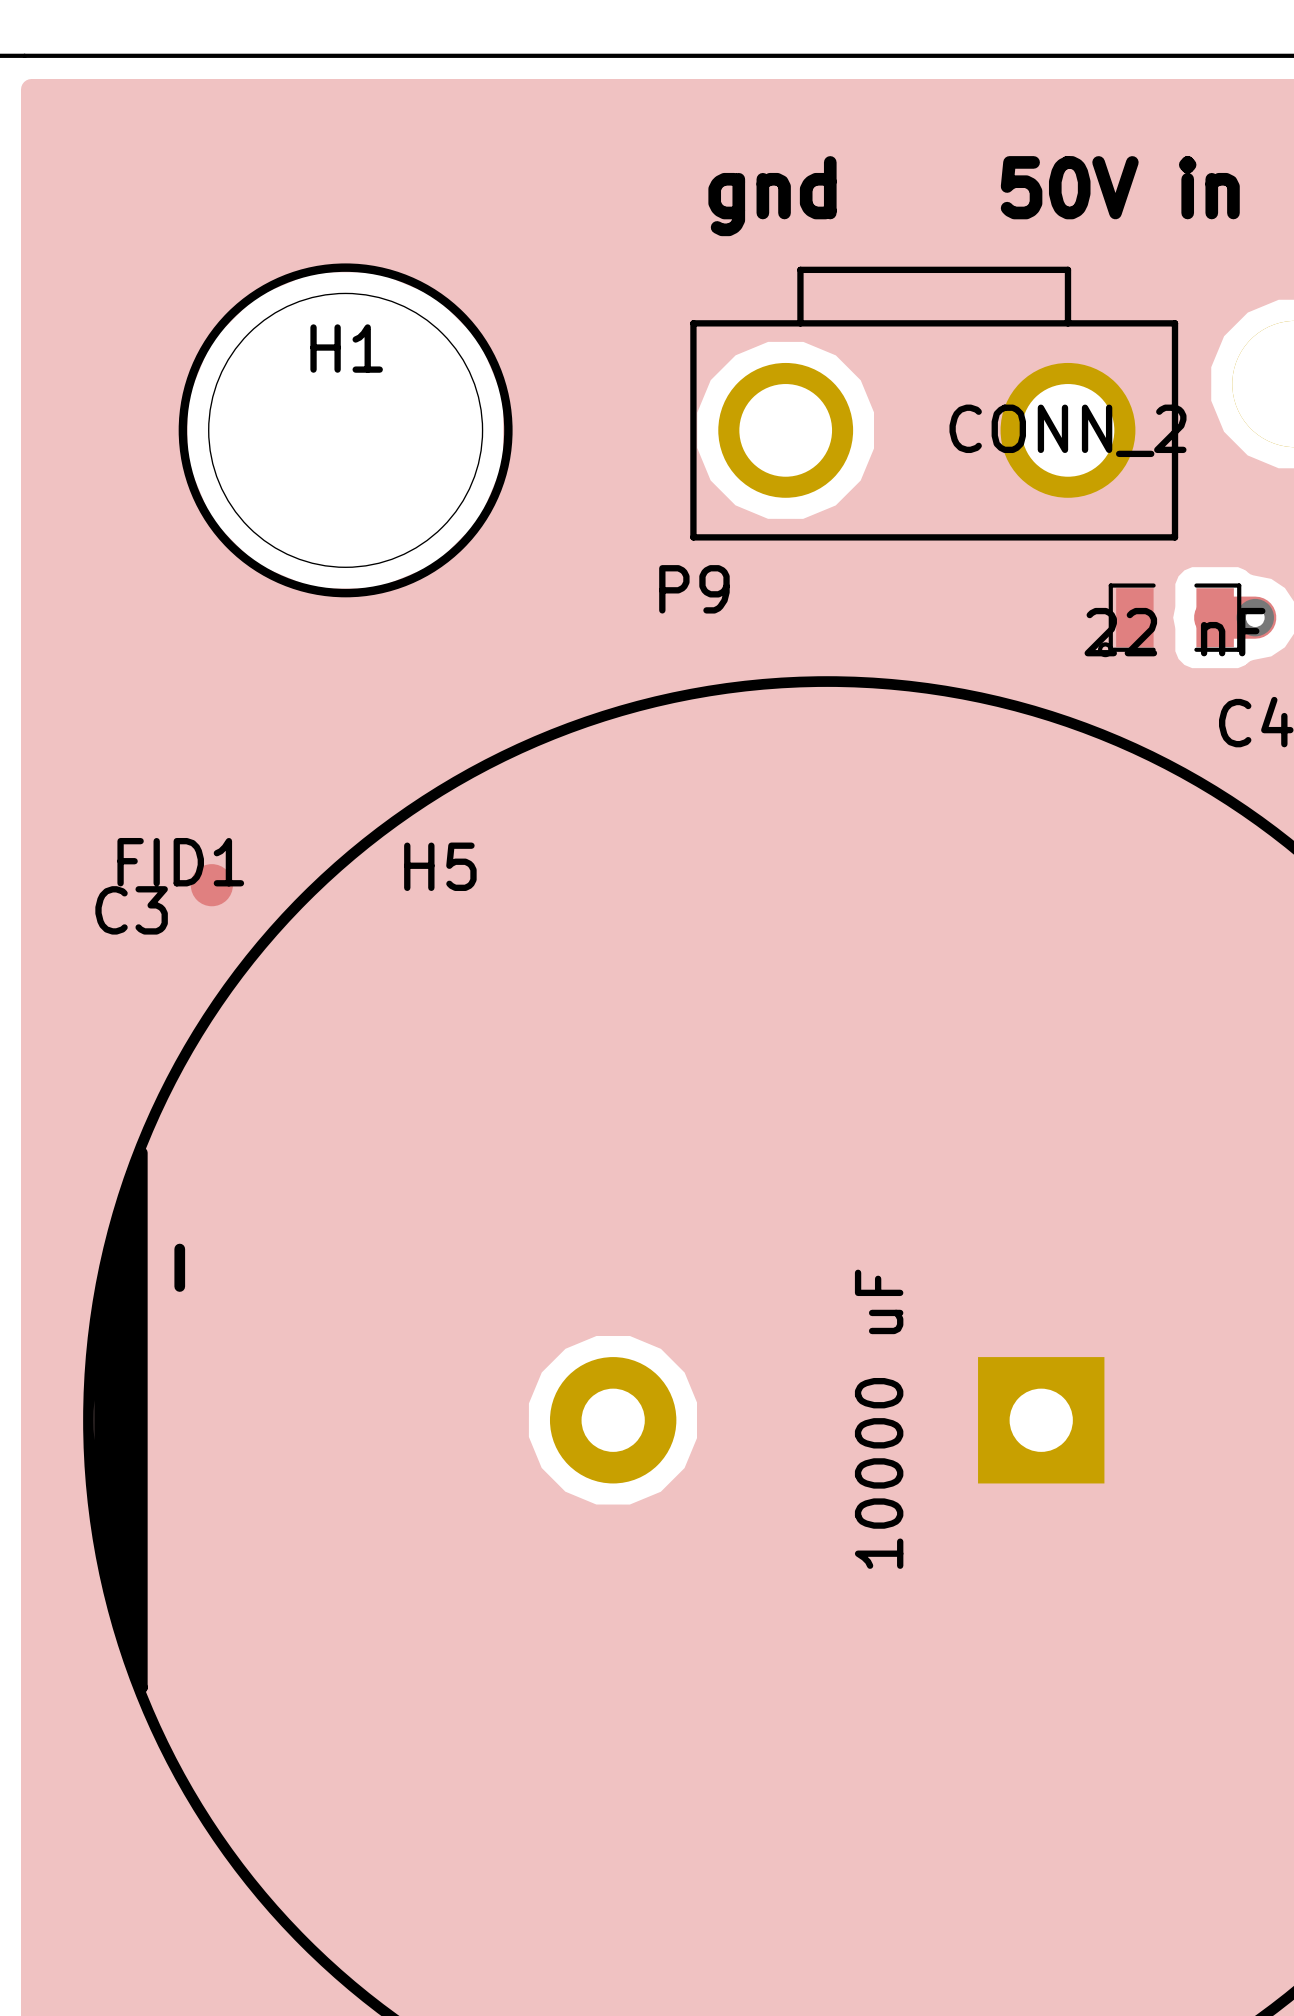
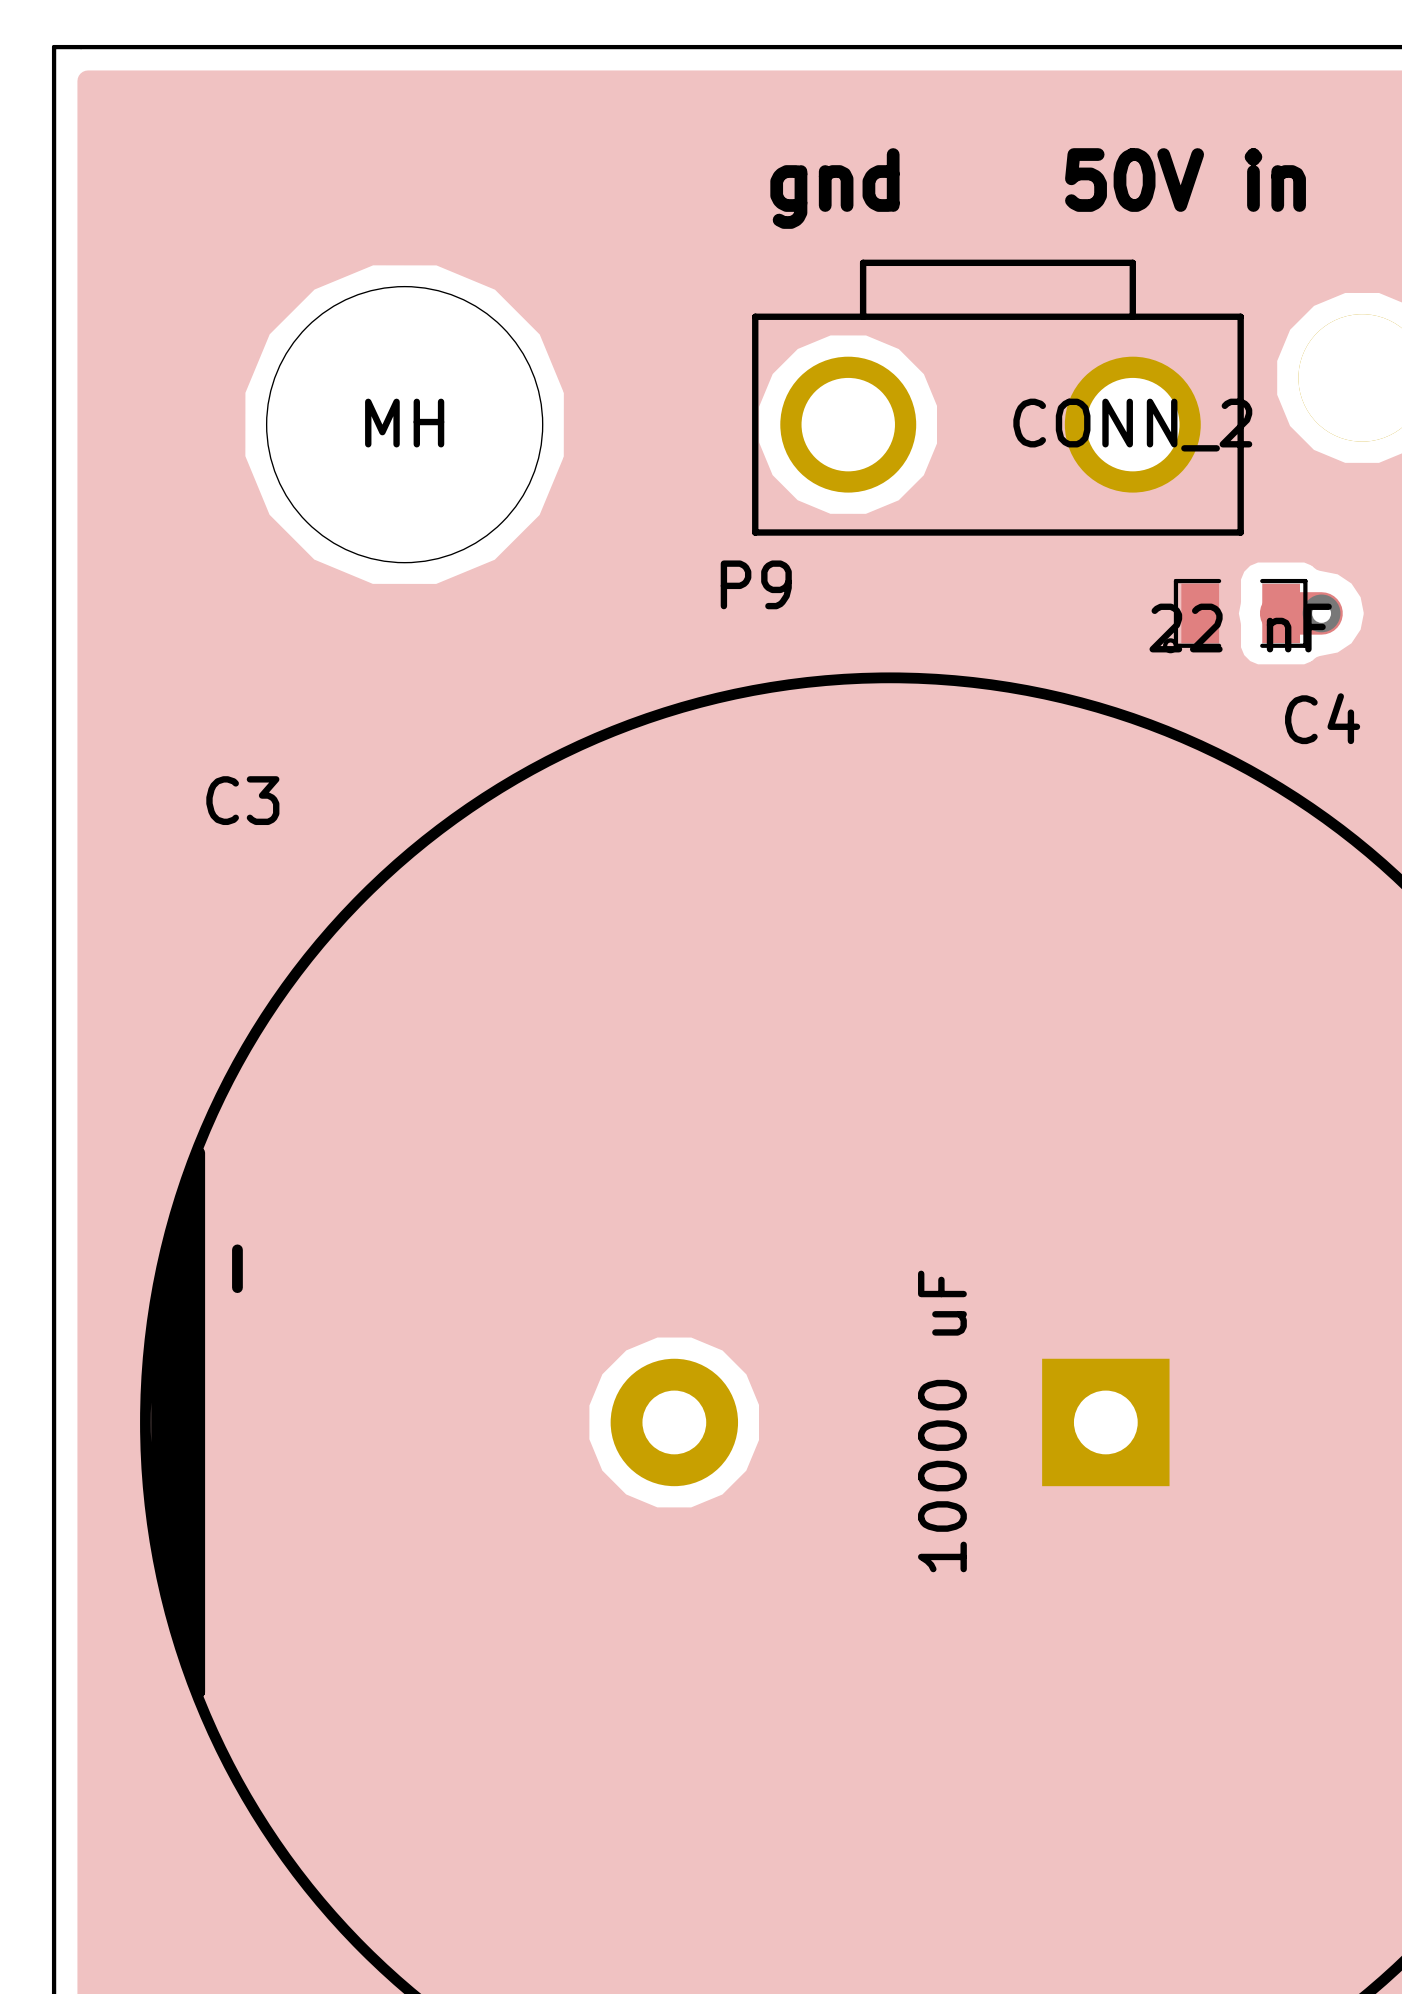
drawing: [178, 263, 513, 598] -> none
H1 name: H1 (346, 348) -> MH (404, 423)
H5: FID1 (211, 885) -> none
C3 name position: C3 (131, 910) -> C3 (242, 800)

